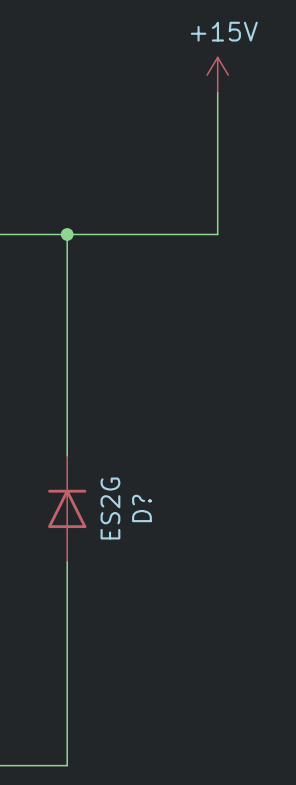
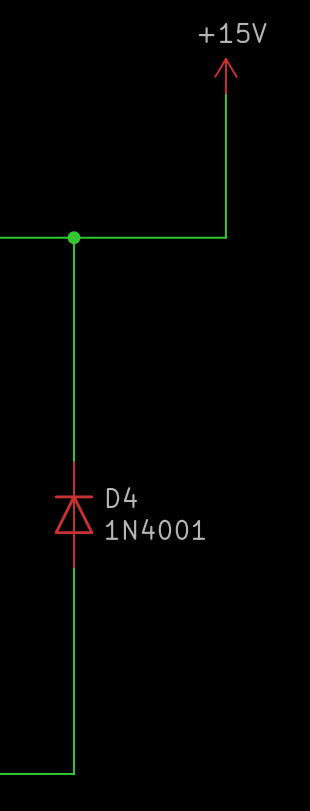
D? value: ES2G (110, 508) -> 1N4001 (155, 529)
D? name: D? (141, 508) -> D4 (121, 497)

